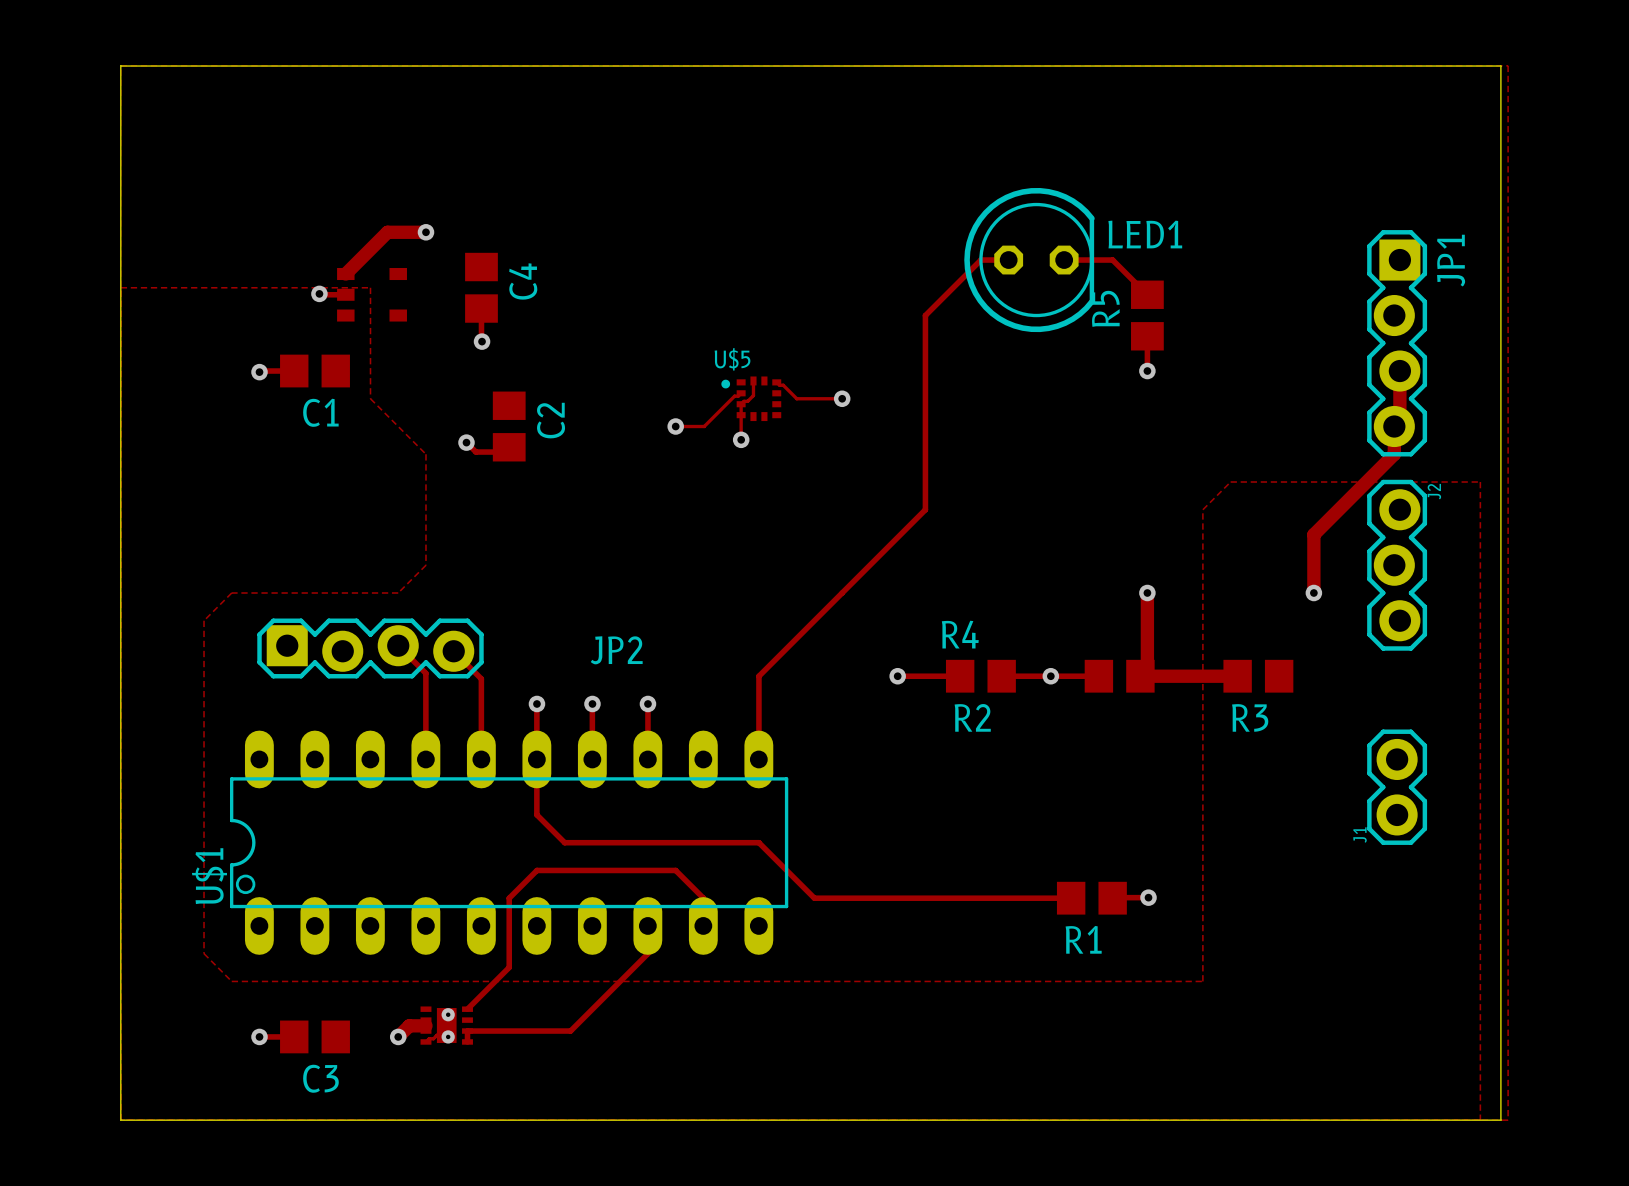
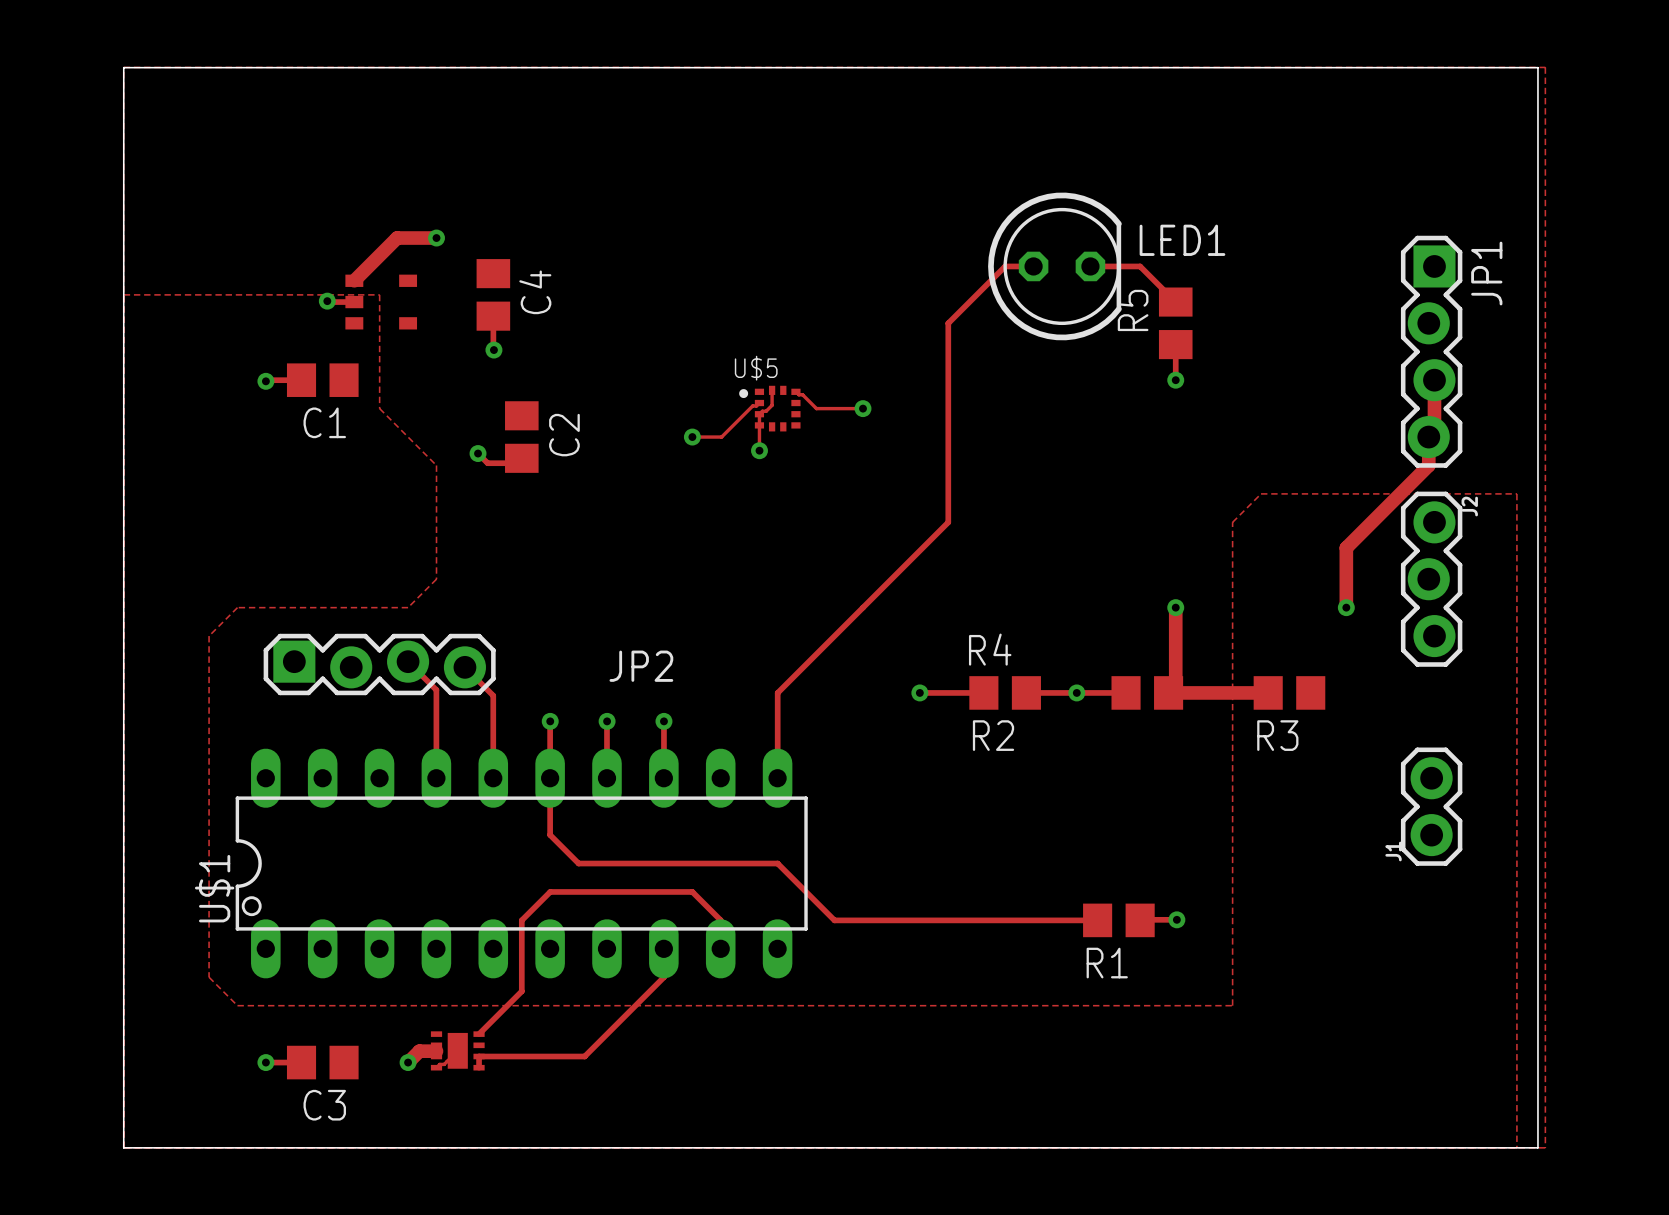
via: (448, 1014) -> none
via: (448, 1036) -> none

